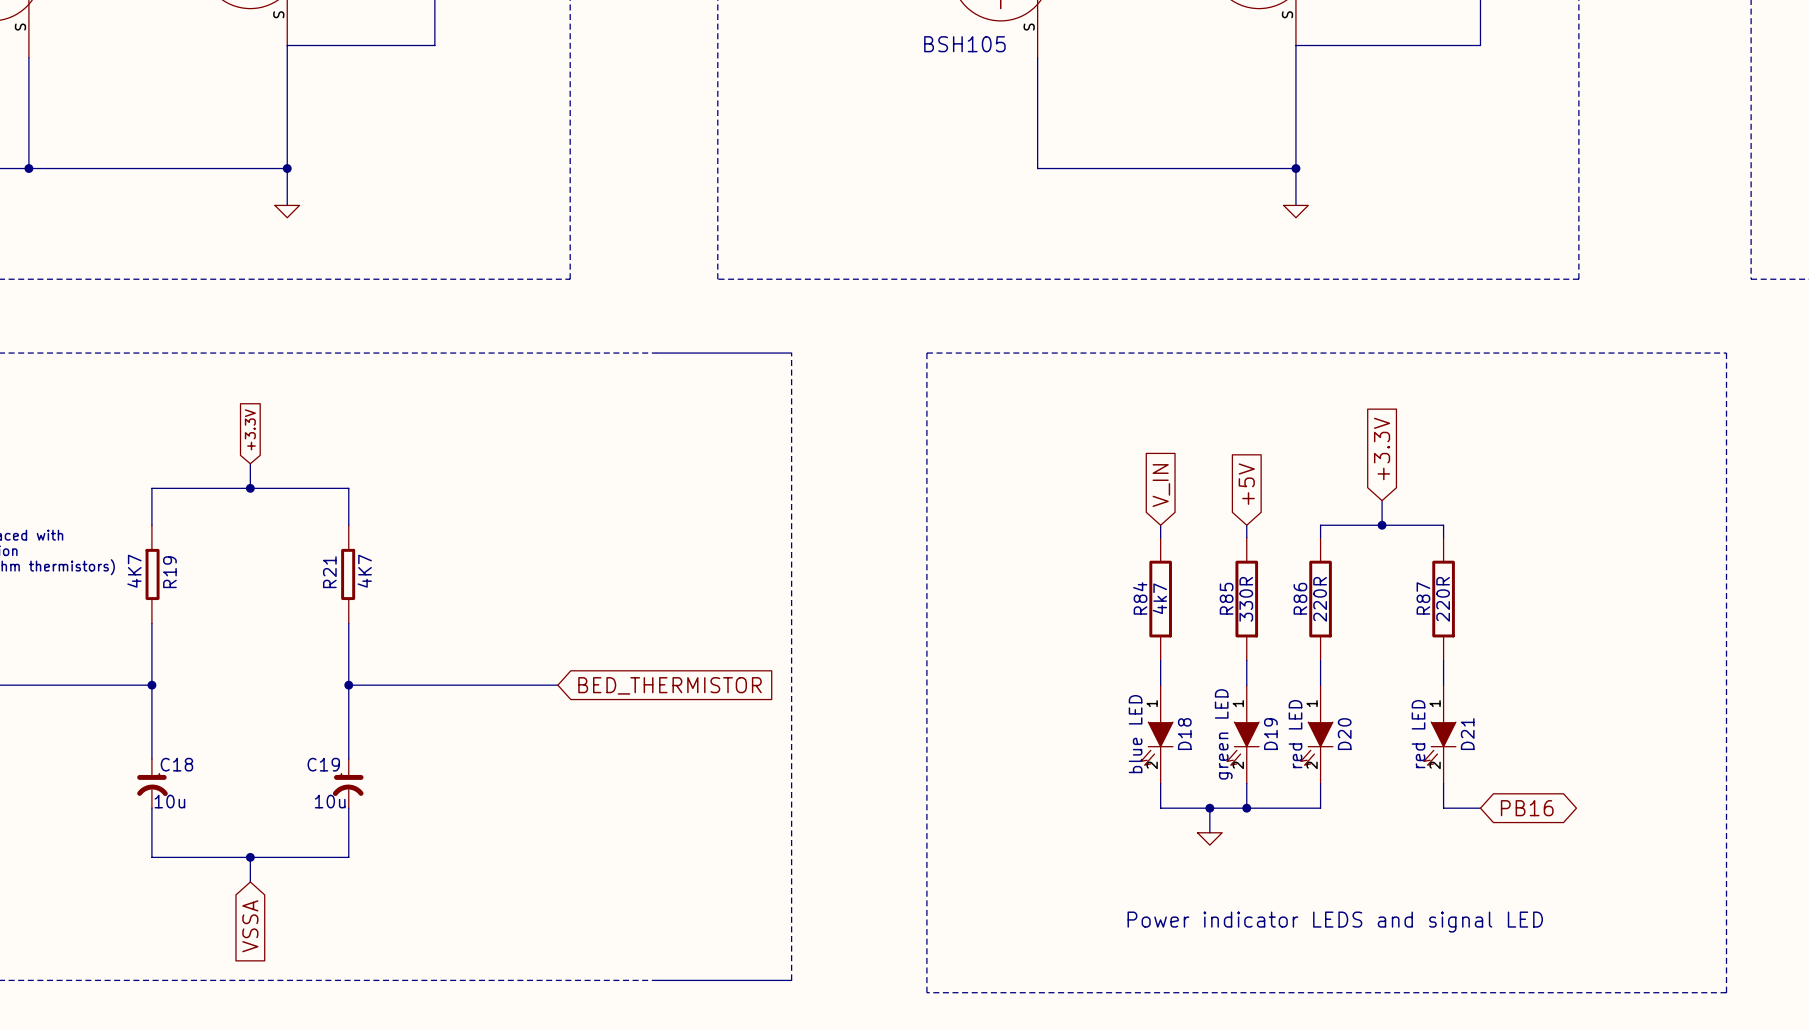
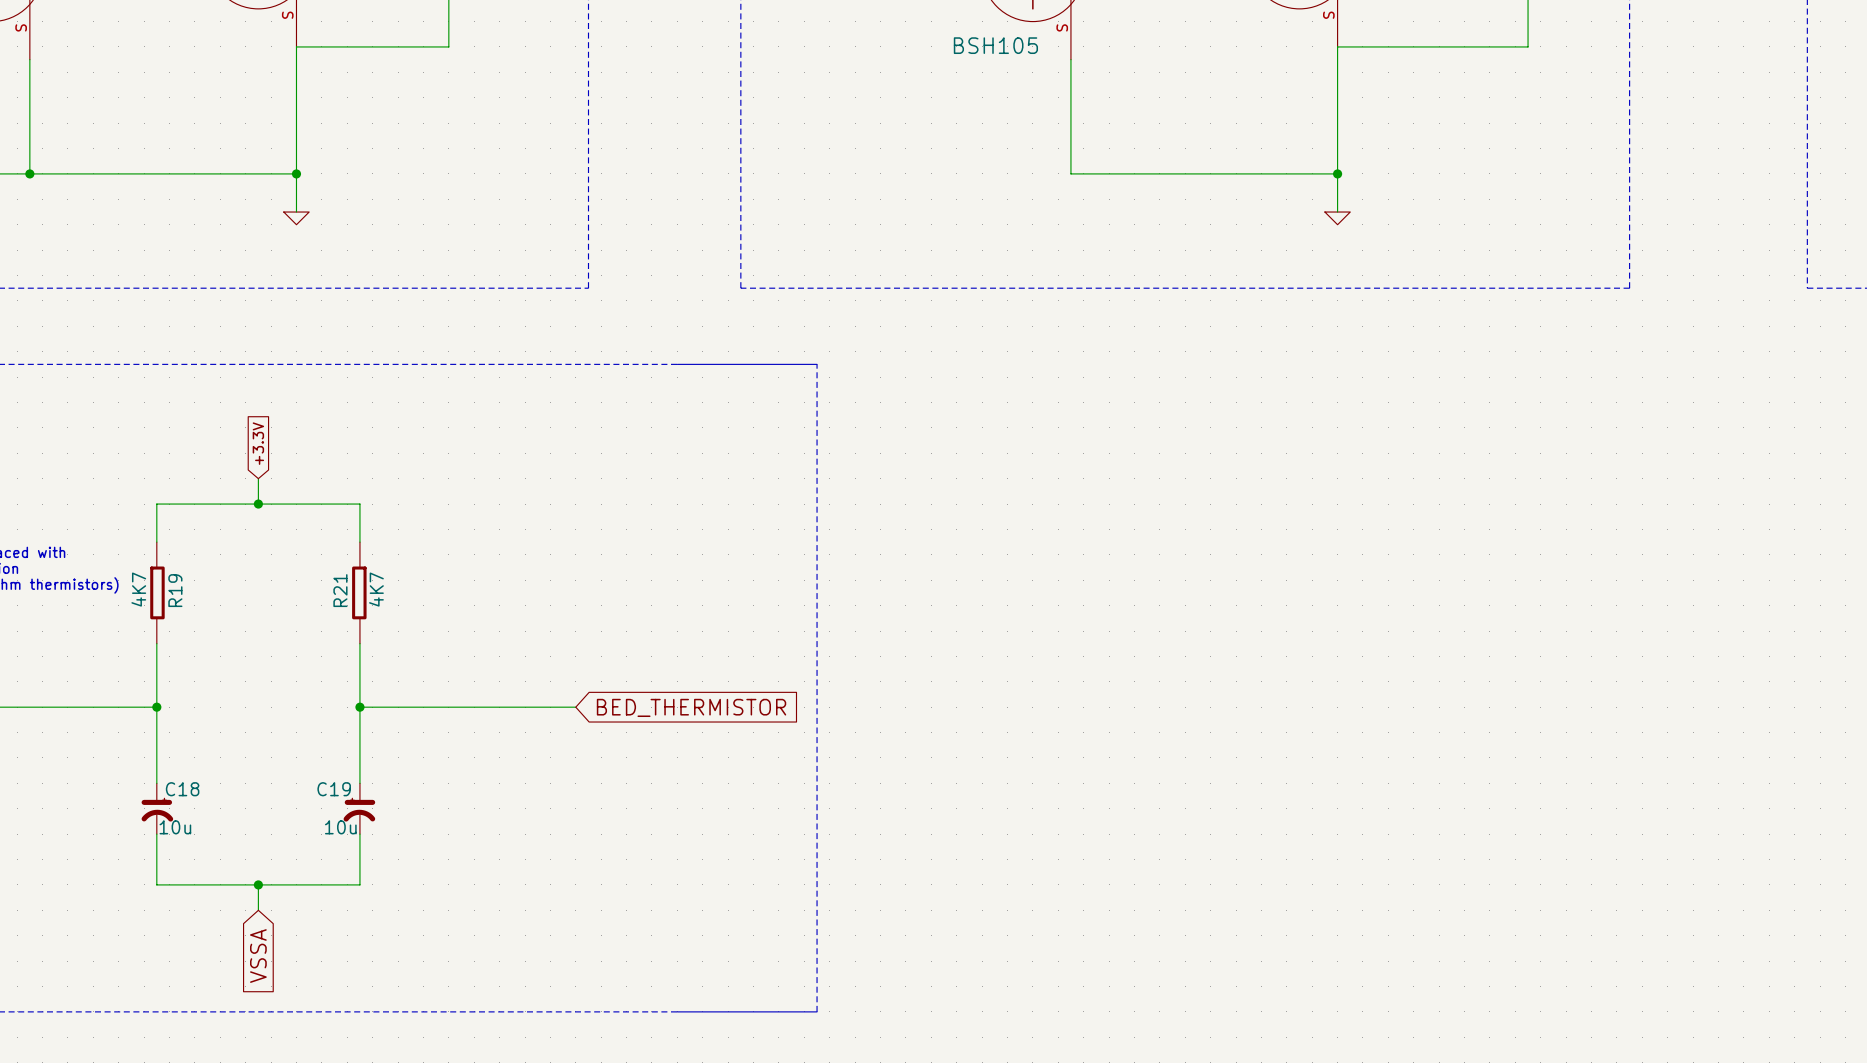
line: (926, 353) (1726, 353) (1726, 992) (926, 992) (926, 353) -> none
global label: +3.3V (1382, 448) -> none
global label: +5V (1246, 484) -> none
global label: V_IN (1161, 485) -> none
wire: (1382, 500) (1382, 525) -> none
wire: (1160, 525) (1160, 537) -> none
wire: (1246, 525) (1246, 537) -> none
junction: (1382, 525) -> none
wire: (1320, 537) (1320, 525) (1443, 525) (1443, 537) -> none
R84: 4k7 (1160, 599) -> none
R85: 330R (1246, 599) -> none
R86: 220R (1320, 599) -> none
R87: 220R (1443, 599) -> none
wire: (1160, 660) (1160, 685) -> none
wire: (1246, 660) (1246, 685) -> none
wire: (1320, 660) (1320, 685) -> none
wire: (1443, 660) (1443, 685) -> none
D18: blue LED (1156, 734) -> none
D19: green LED (1243, 734) -> none
D20: red LED (1316, 734) -> none
D21: red LED (1439, 734) -> none
wire: (1160, 783) (1160, 808) (1320, 808) (1320, 783) -> none
wire: (1246, 783) (1246, 808) -> none
wire: (1443, 783) (1443, 808) (1480, 808) -> none
wire: (1209, 808) (1209, 832) -> none
junction: (1209, 808) -> none
junction: (1246, 808) -> none
global label: PB16 (1527, 808) -> none
power symbol: (1209, 838) -> none
text: Power indicator LEDS and signal LED (1335, 922) -> none

